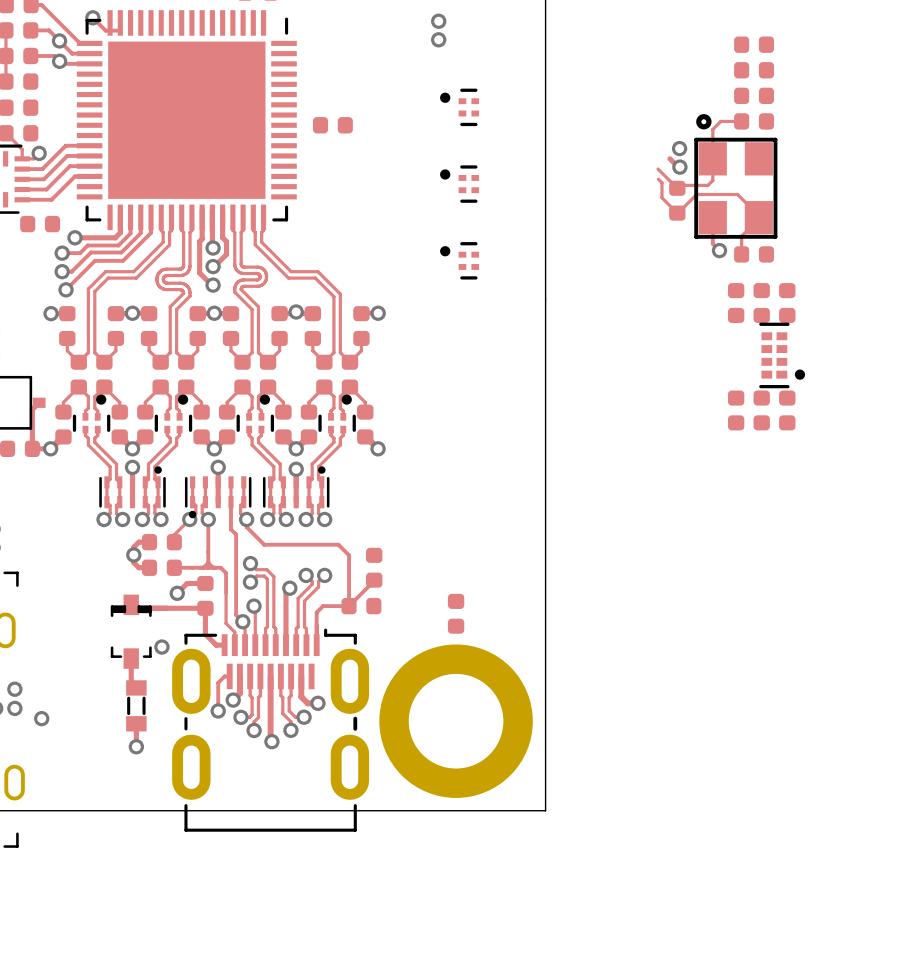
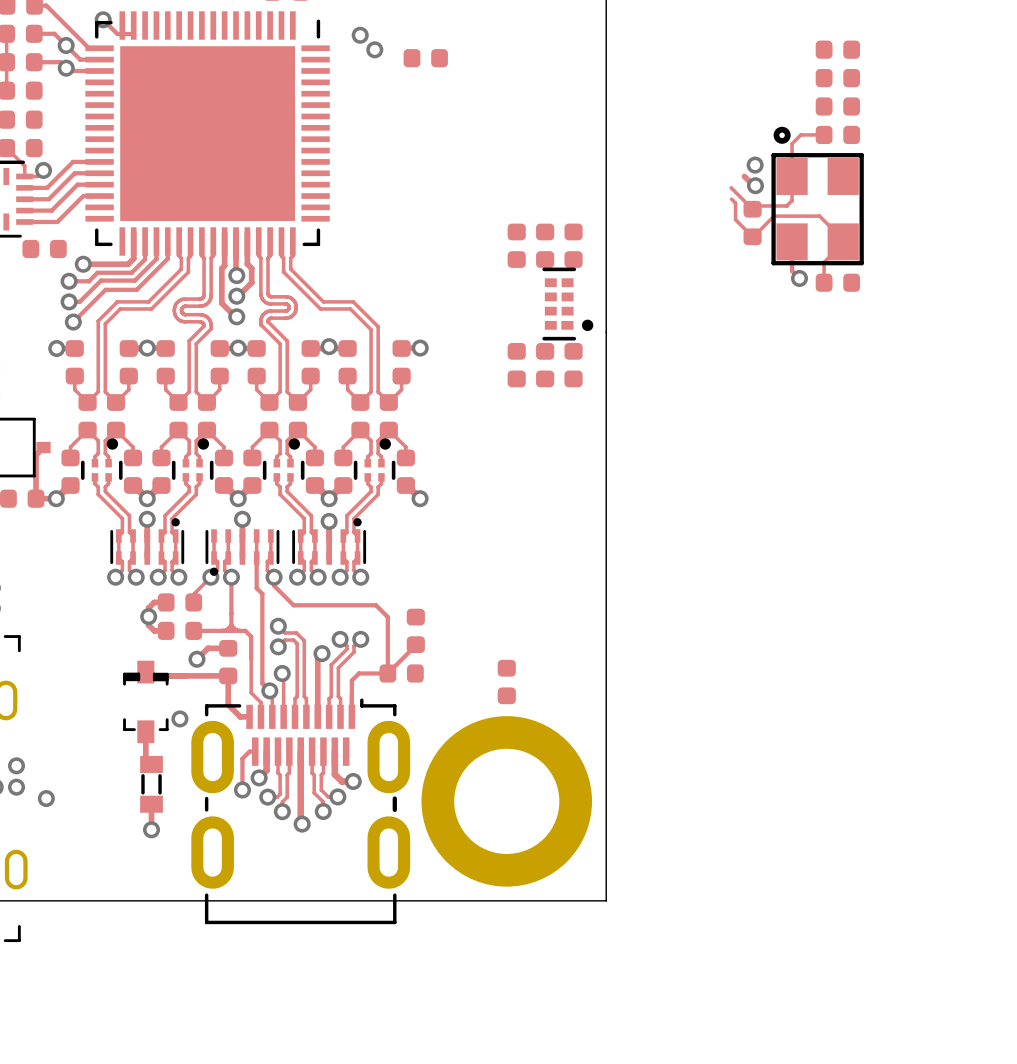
via: (438, 21) -> none
via: none -> (360, 35)
via: (438, 39) -> none
via: none -> (374, 49)
part: none -> (425, 58)
part: (459, 107) -> none
part: (332, 125) -> none
part: (459, 184) -> none
part: none -> (516, 245)
part: none -> (545, 245)
part: none -> (573, 245)
part: (459, 260) -> none
part: (736, 303) -> none
part: (761, 303) -> none
part: (787, 303) -> none
part: none -> (516, 365)
part: none -> (545, 365)
part: none -> (573, 365)
part position: (782, 355) -> (567, 304)
part: (736, 410) -> none
part: (761, 410) -> none
part: (787, 410) -> none

